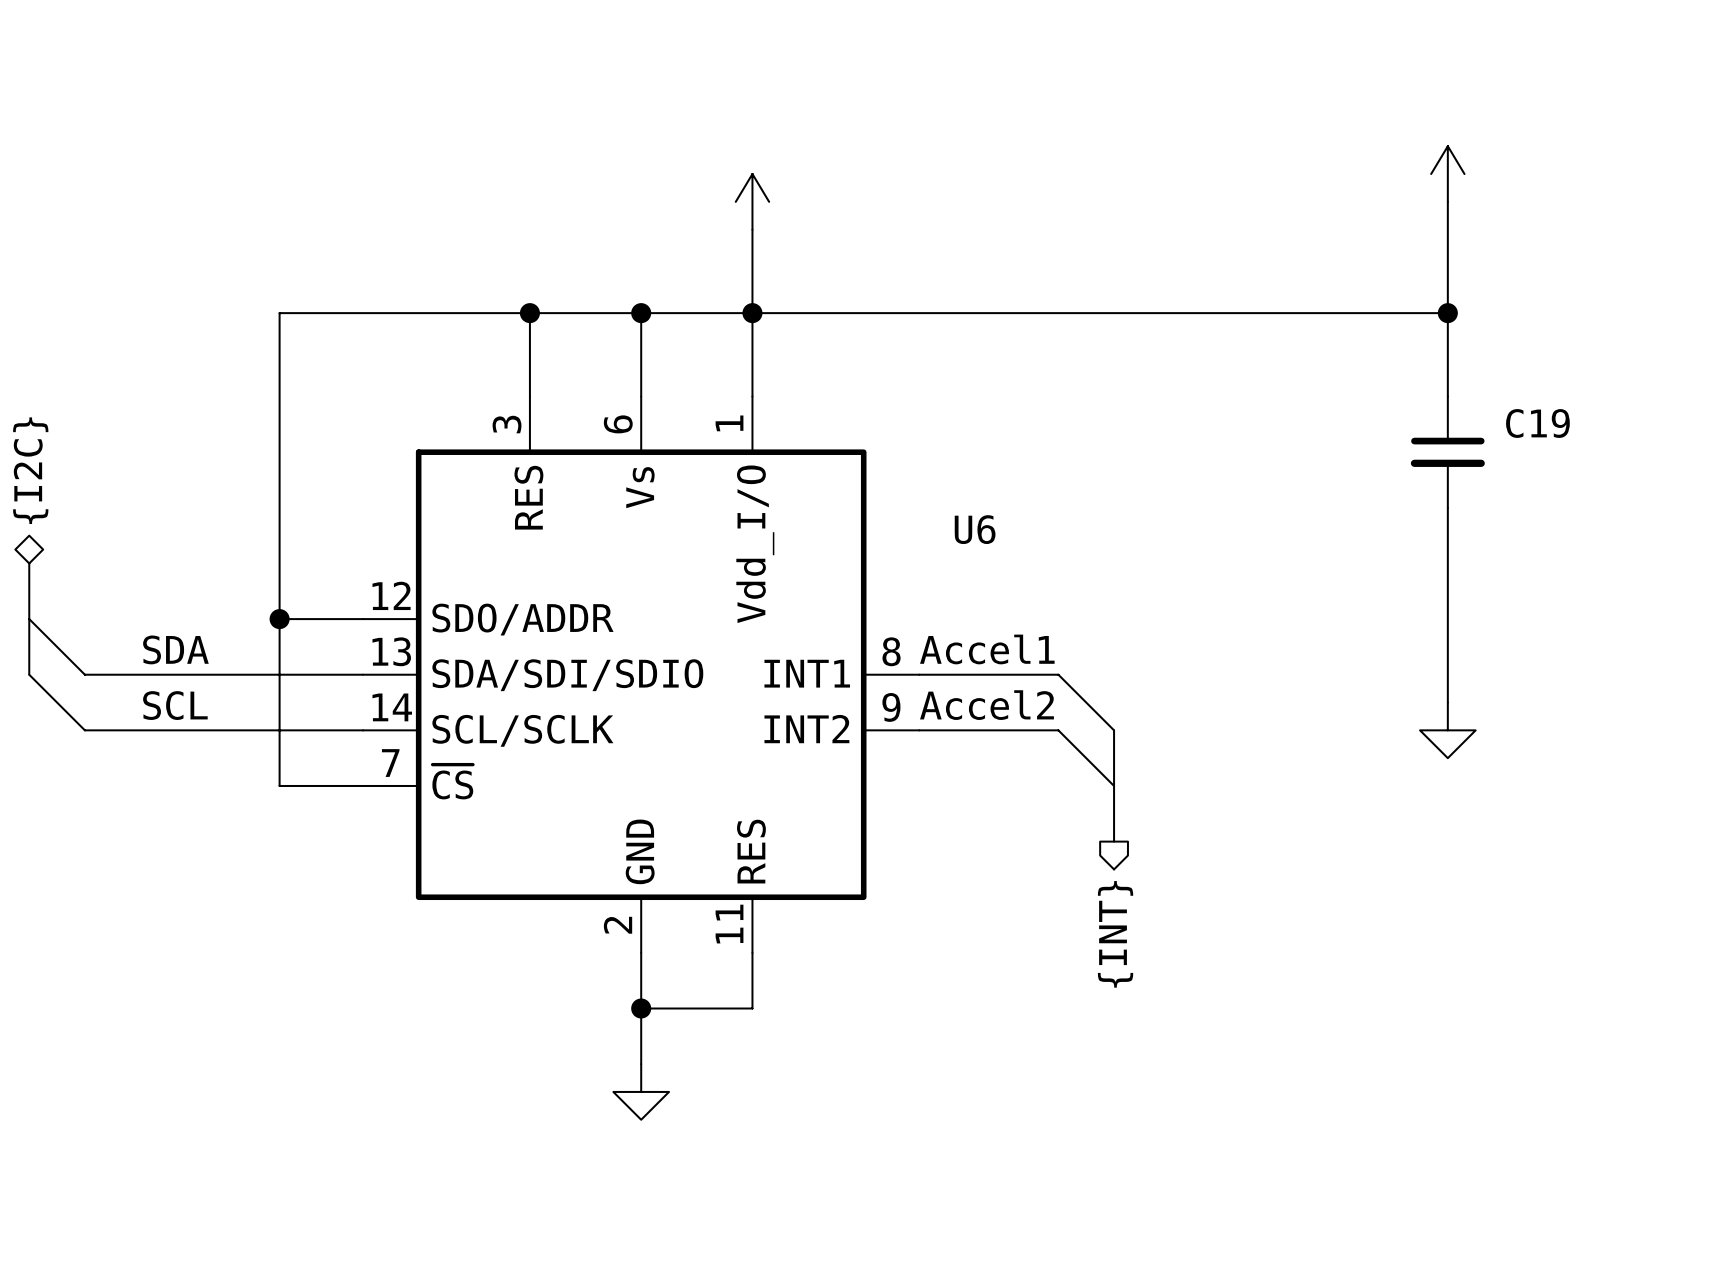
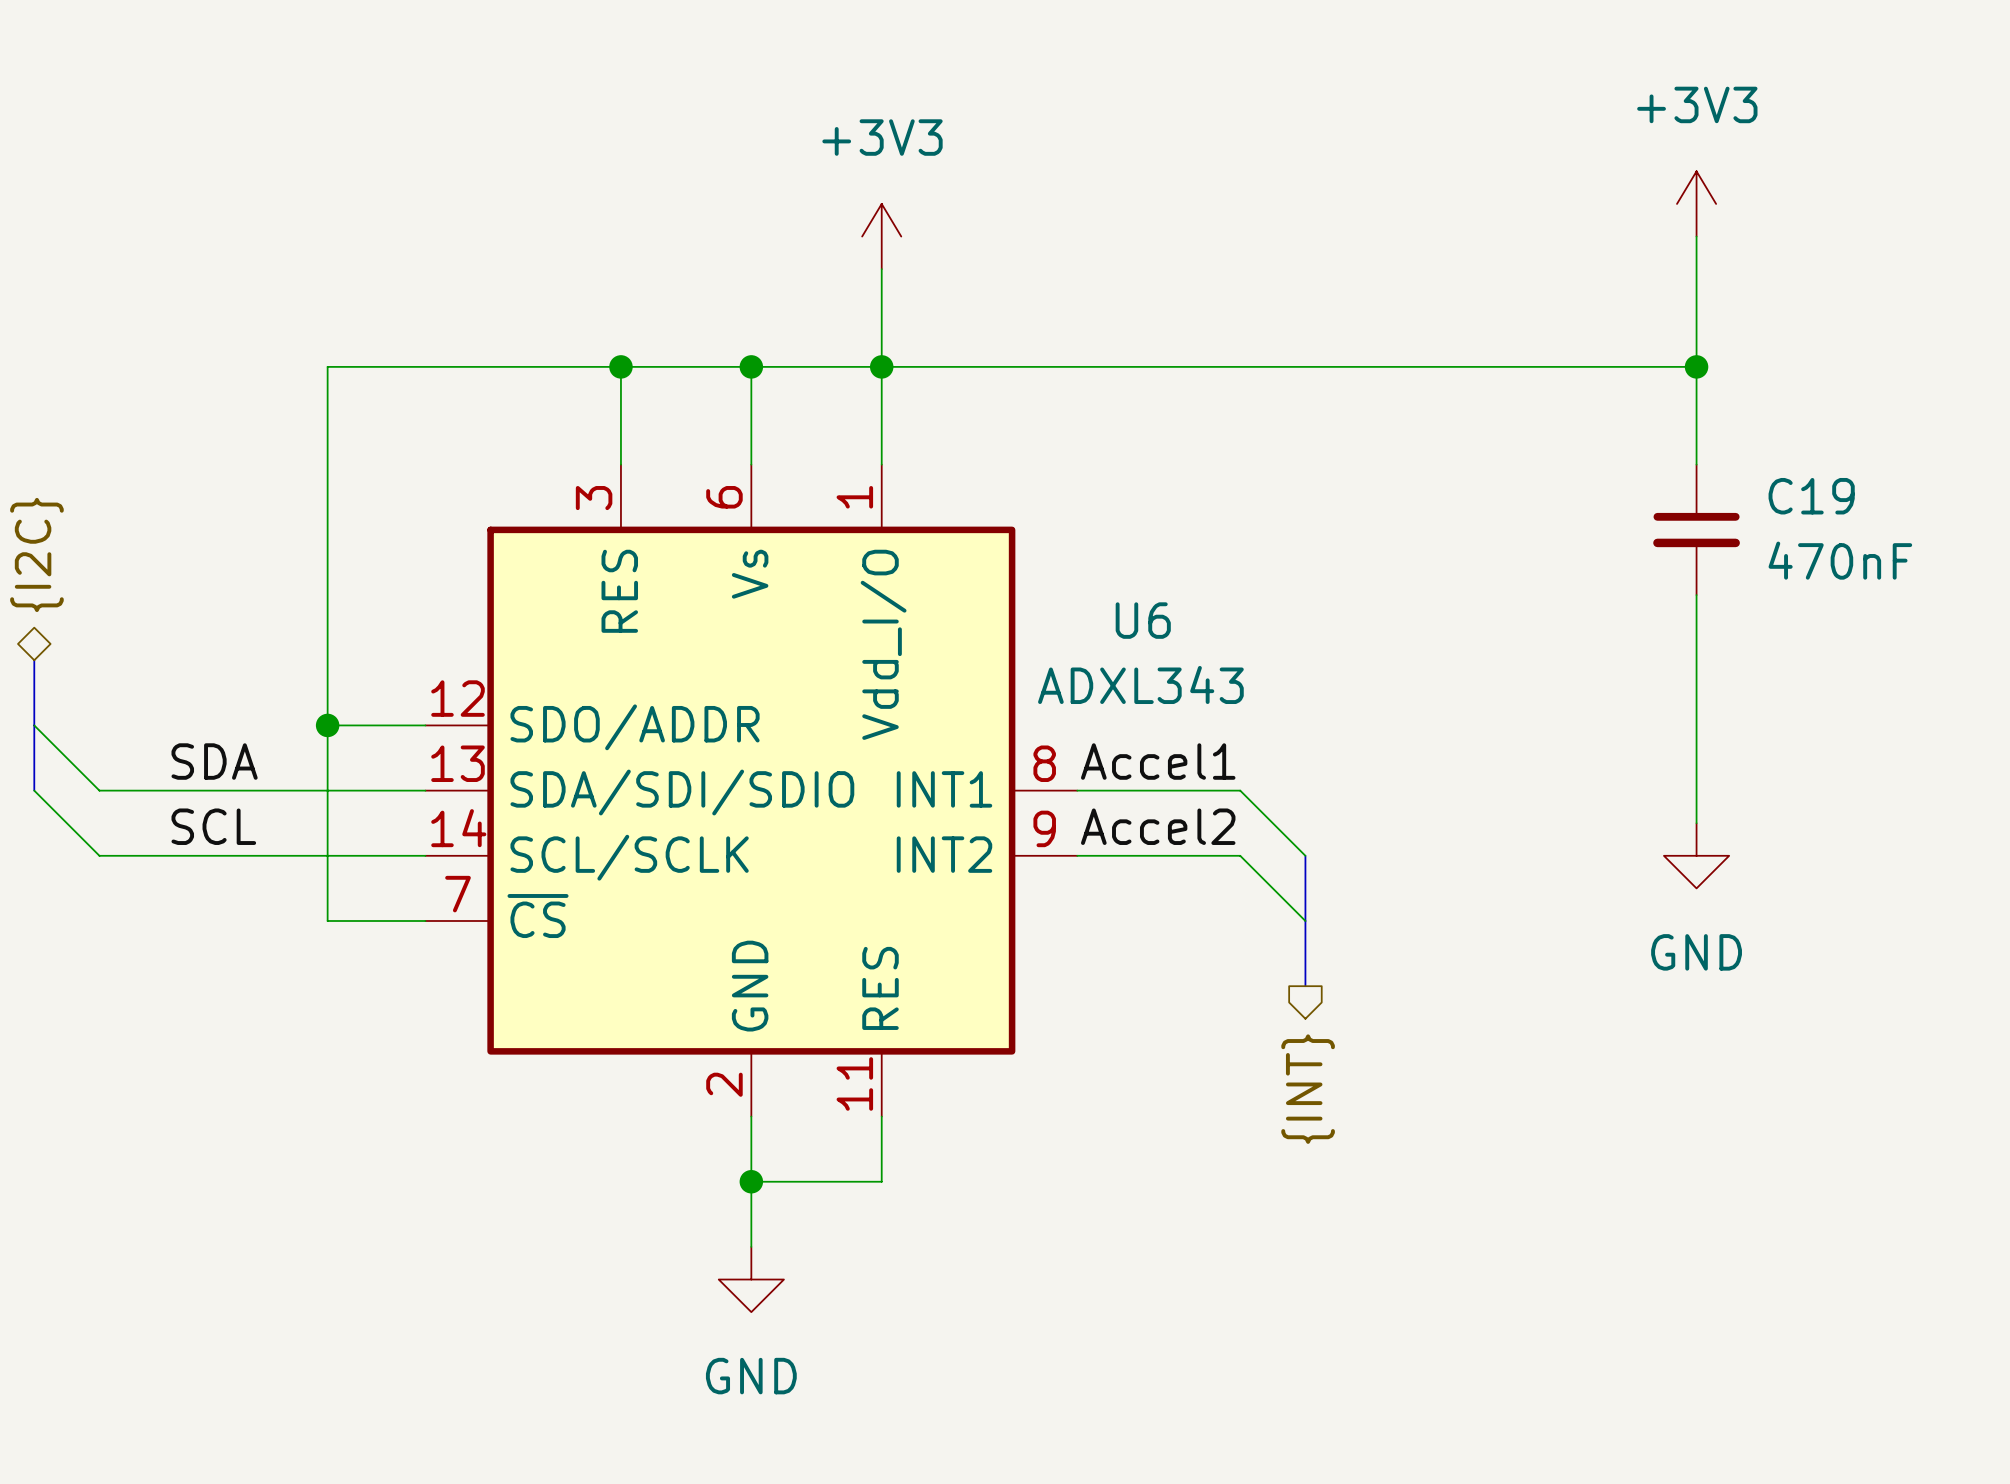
power symbol text: none -> +3V3 (1697, 104)
power symbol text: none -> +3V3 (882, 137)
C19 value: none -> 470nF (1840, 560)
U6 value: none -> ADXL343 (1140, 684)
power symbol text: none -> GND (1696, 952)
power symbol text: none -> GND (751, 1376)

